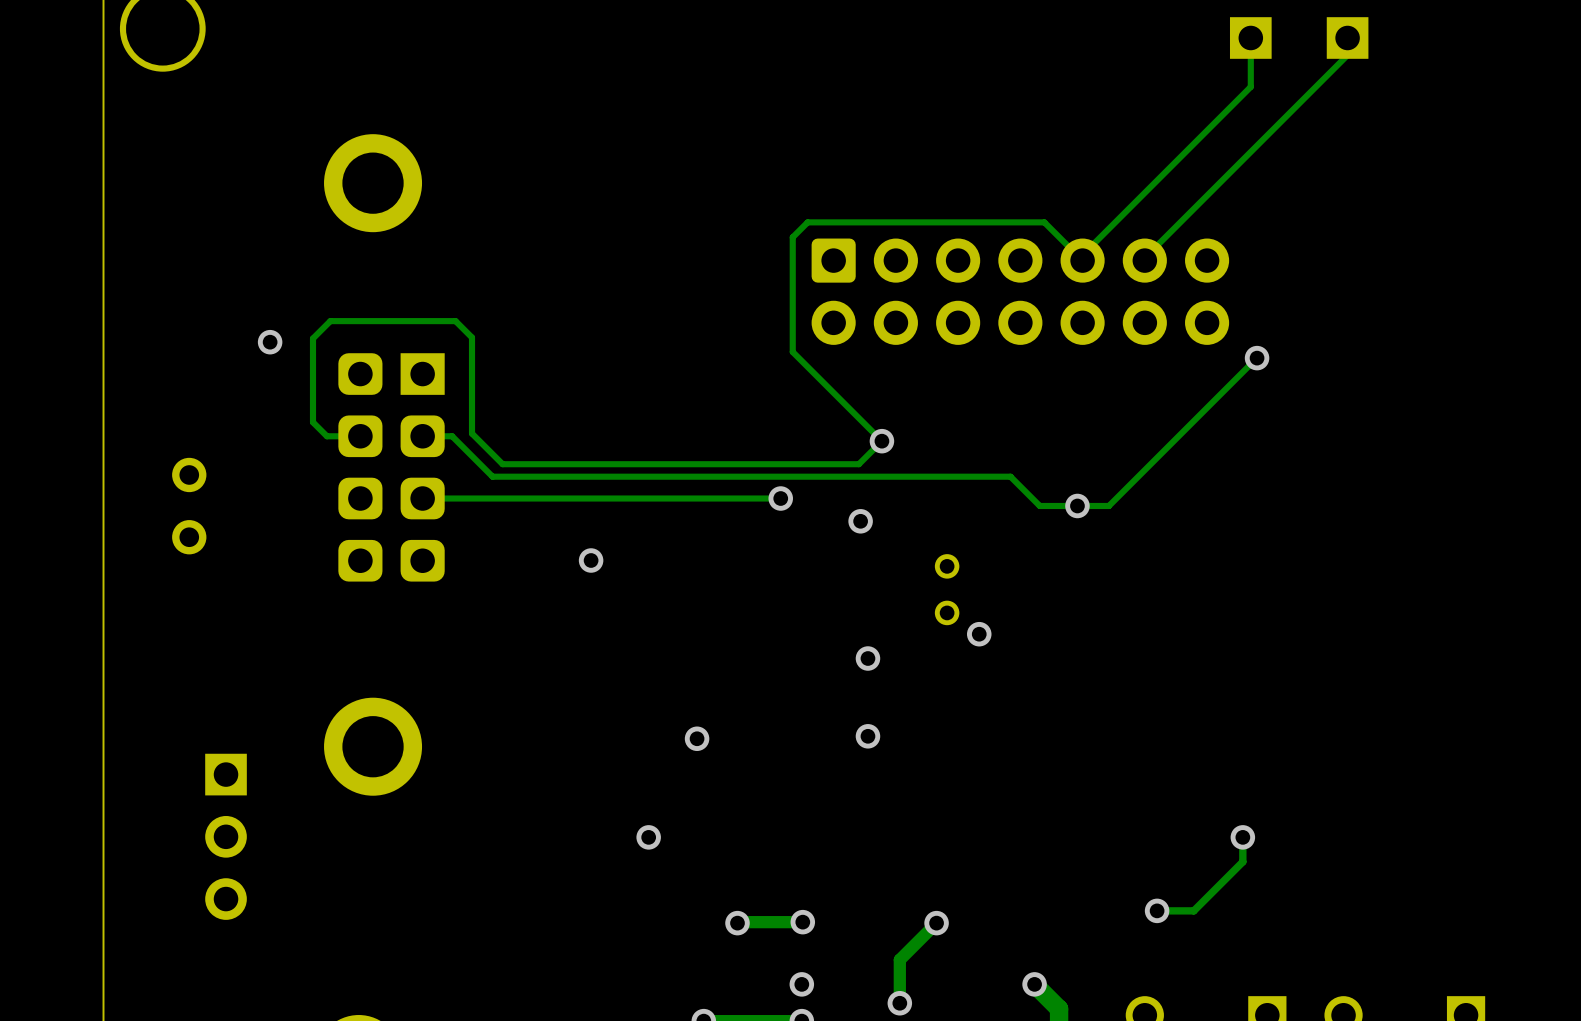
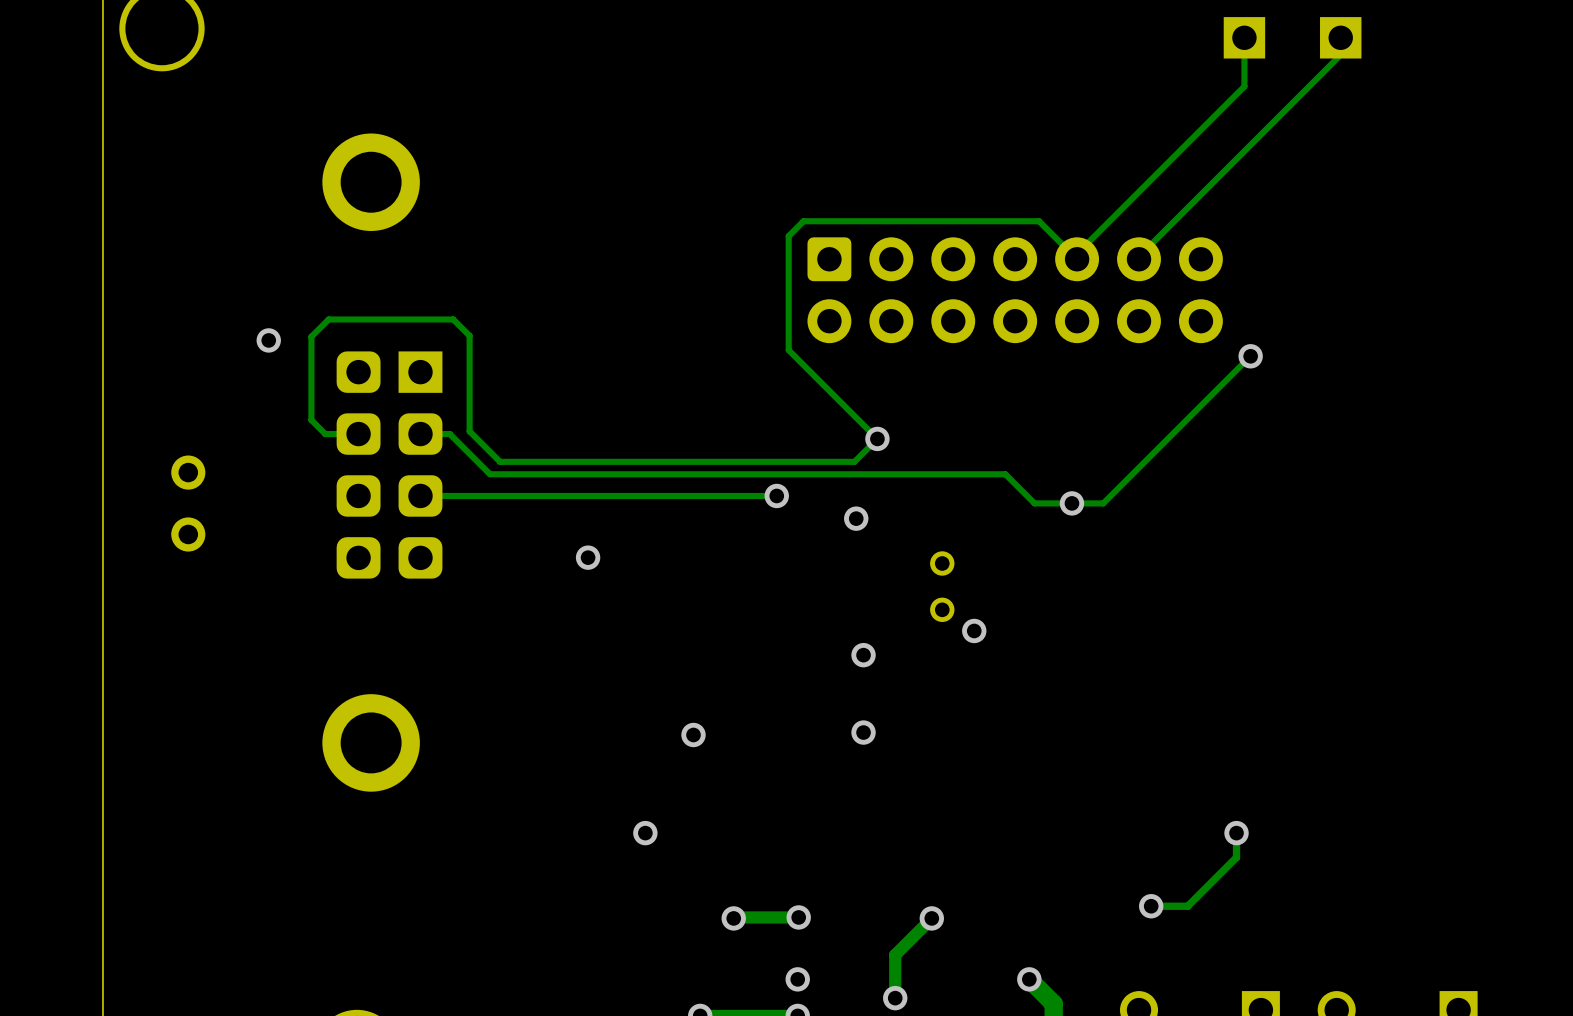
part: (226, 836) -> none

